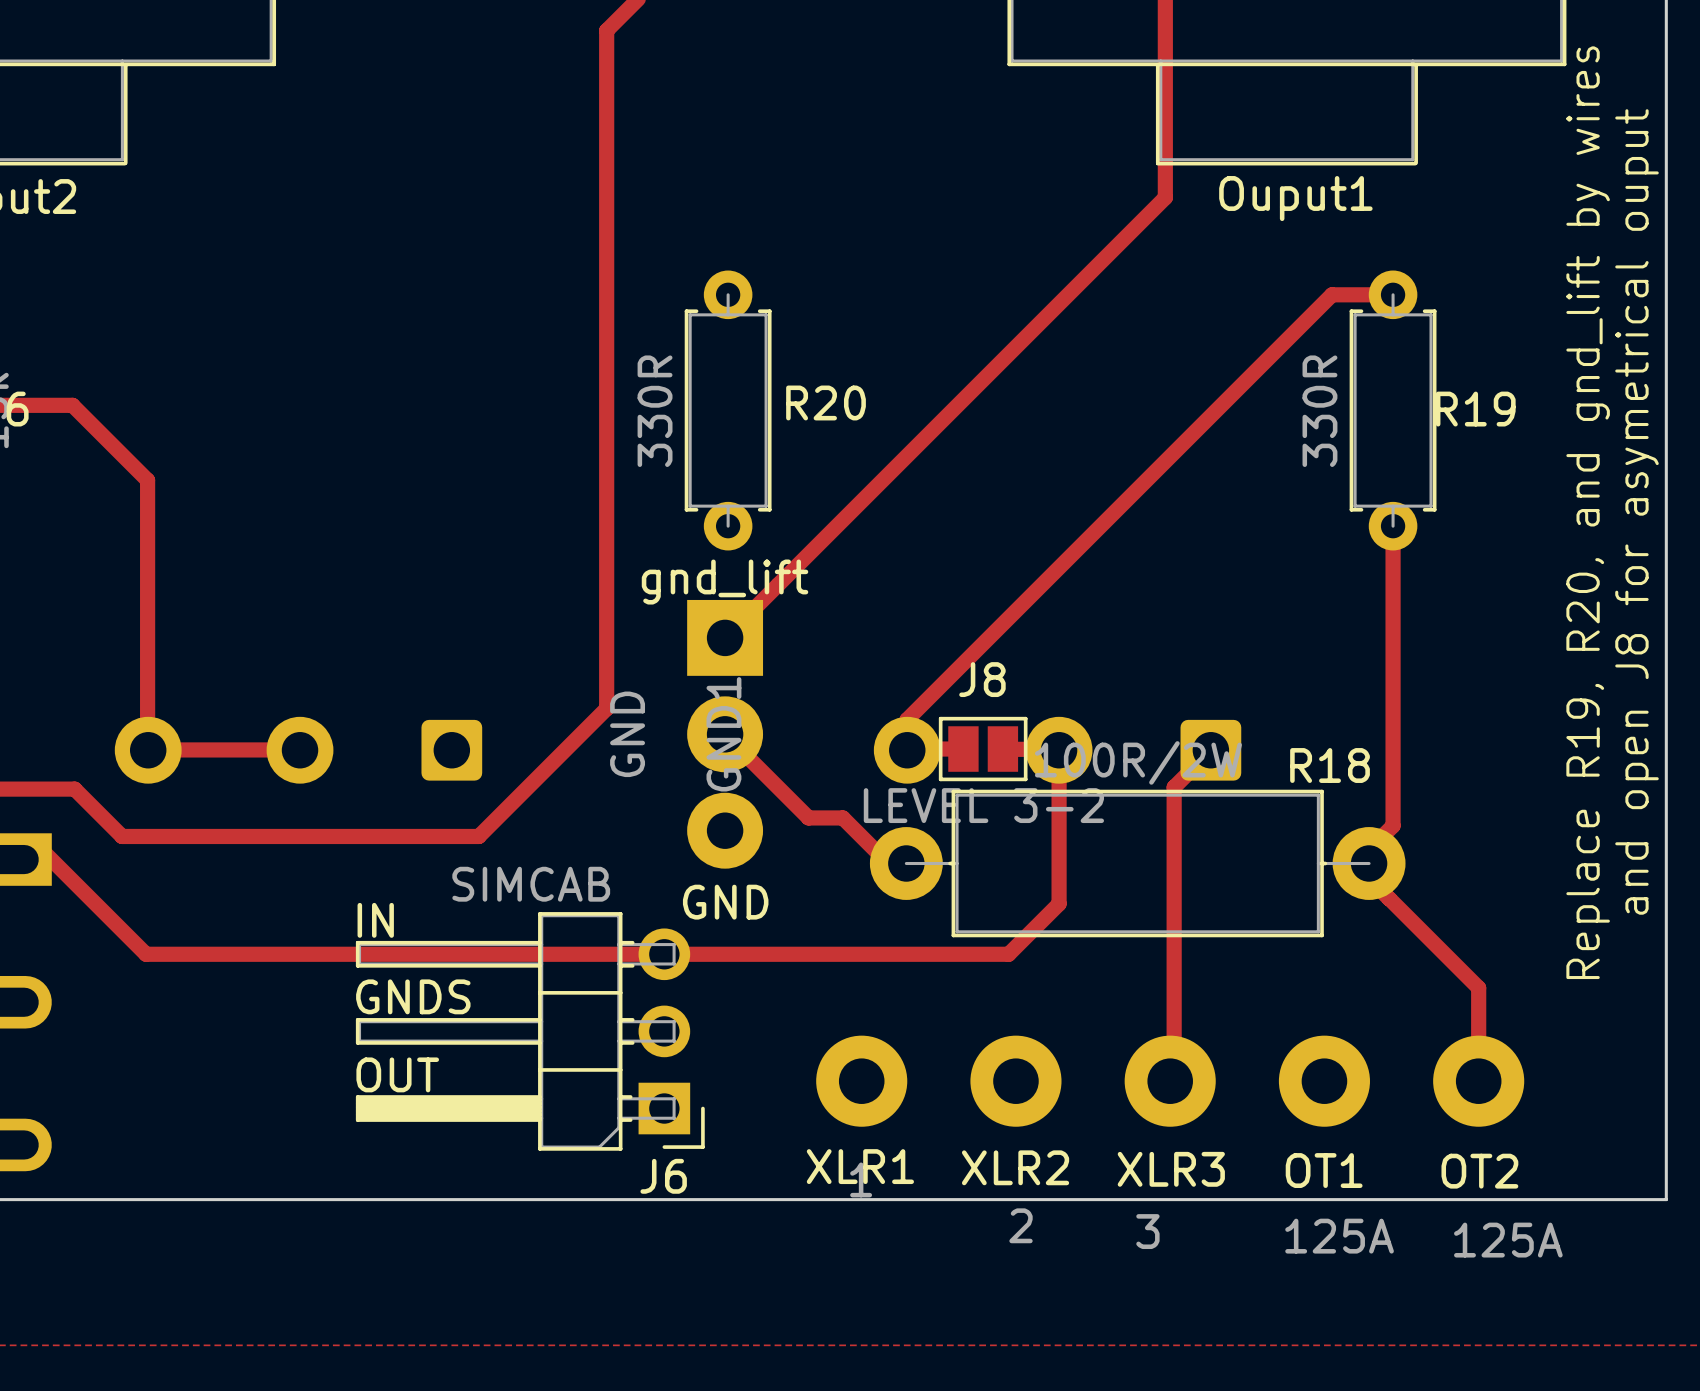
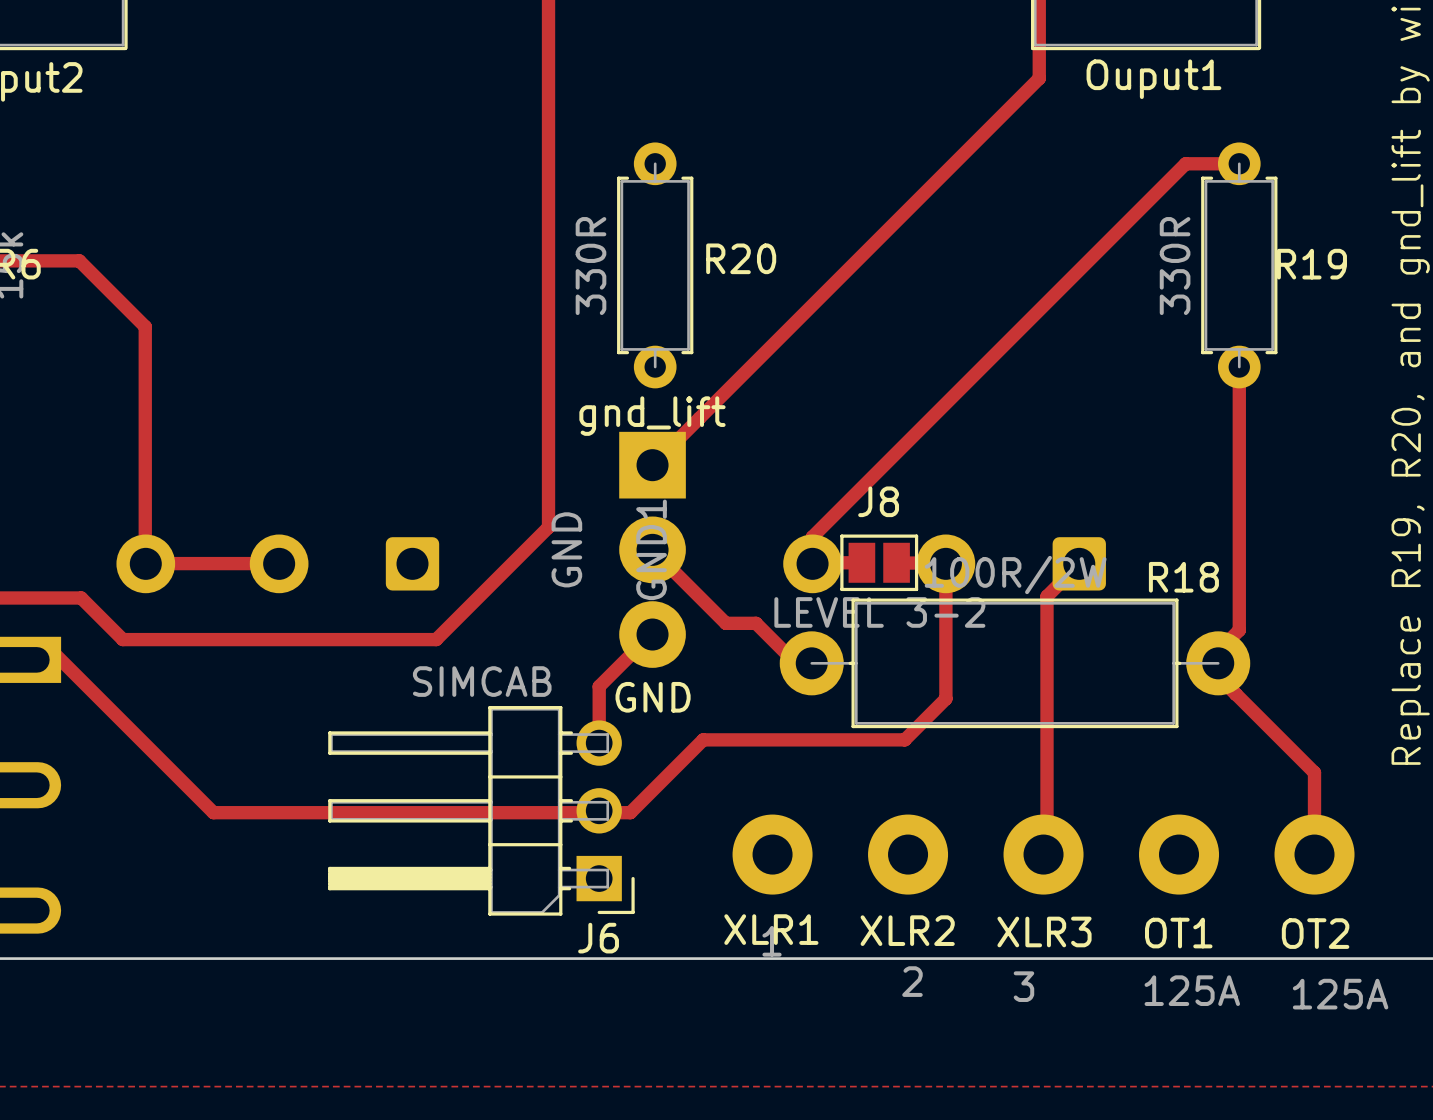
track: none -> (652, 633) (599, 686) (599, 743)
text: IN (375, 920) -> none
track: (1012, 950) (1008, 954) (146, 954) -> (904, 739) (703, 739) (630, 812) (213, 812) (143, 743)
text: GNDS (413, 996) -> none
text: OUT (397, 1074) -> none

